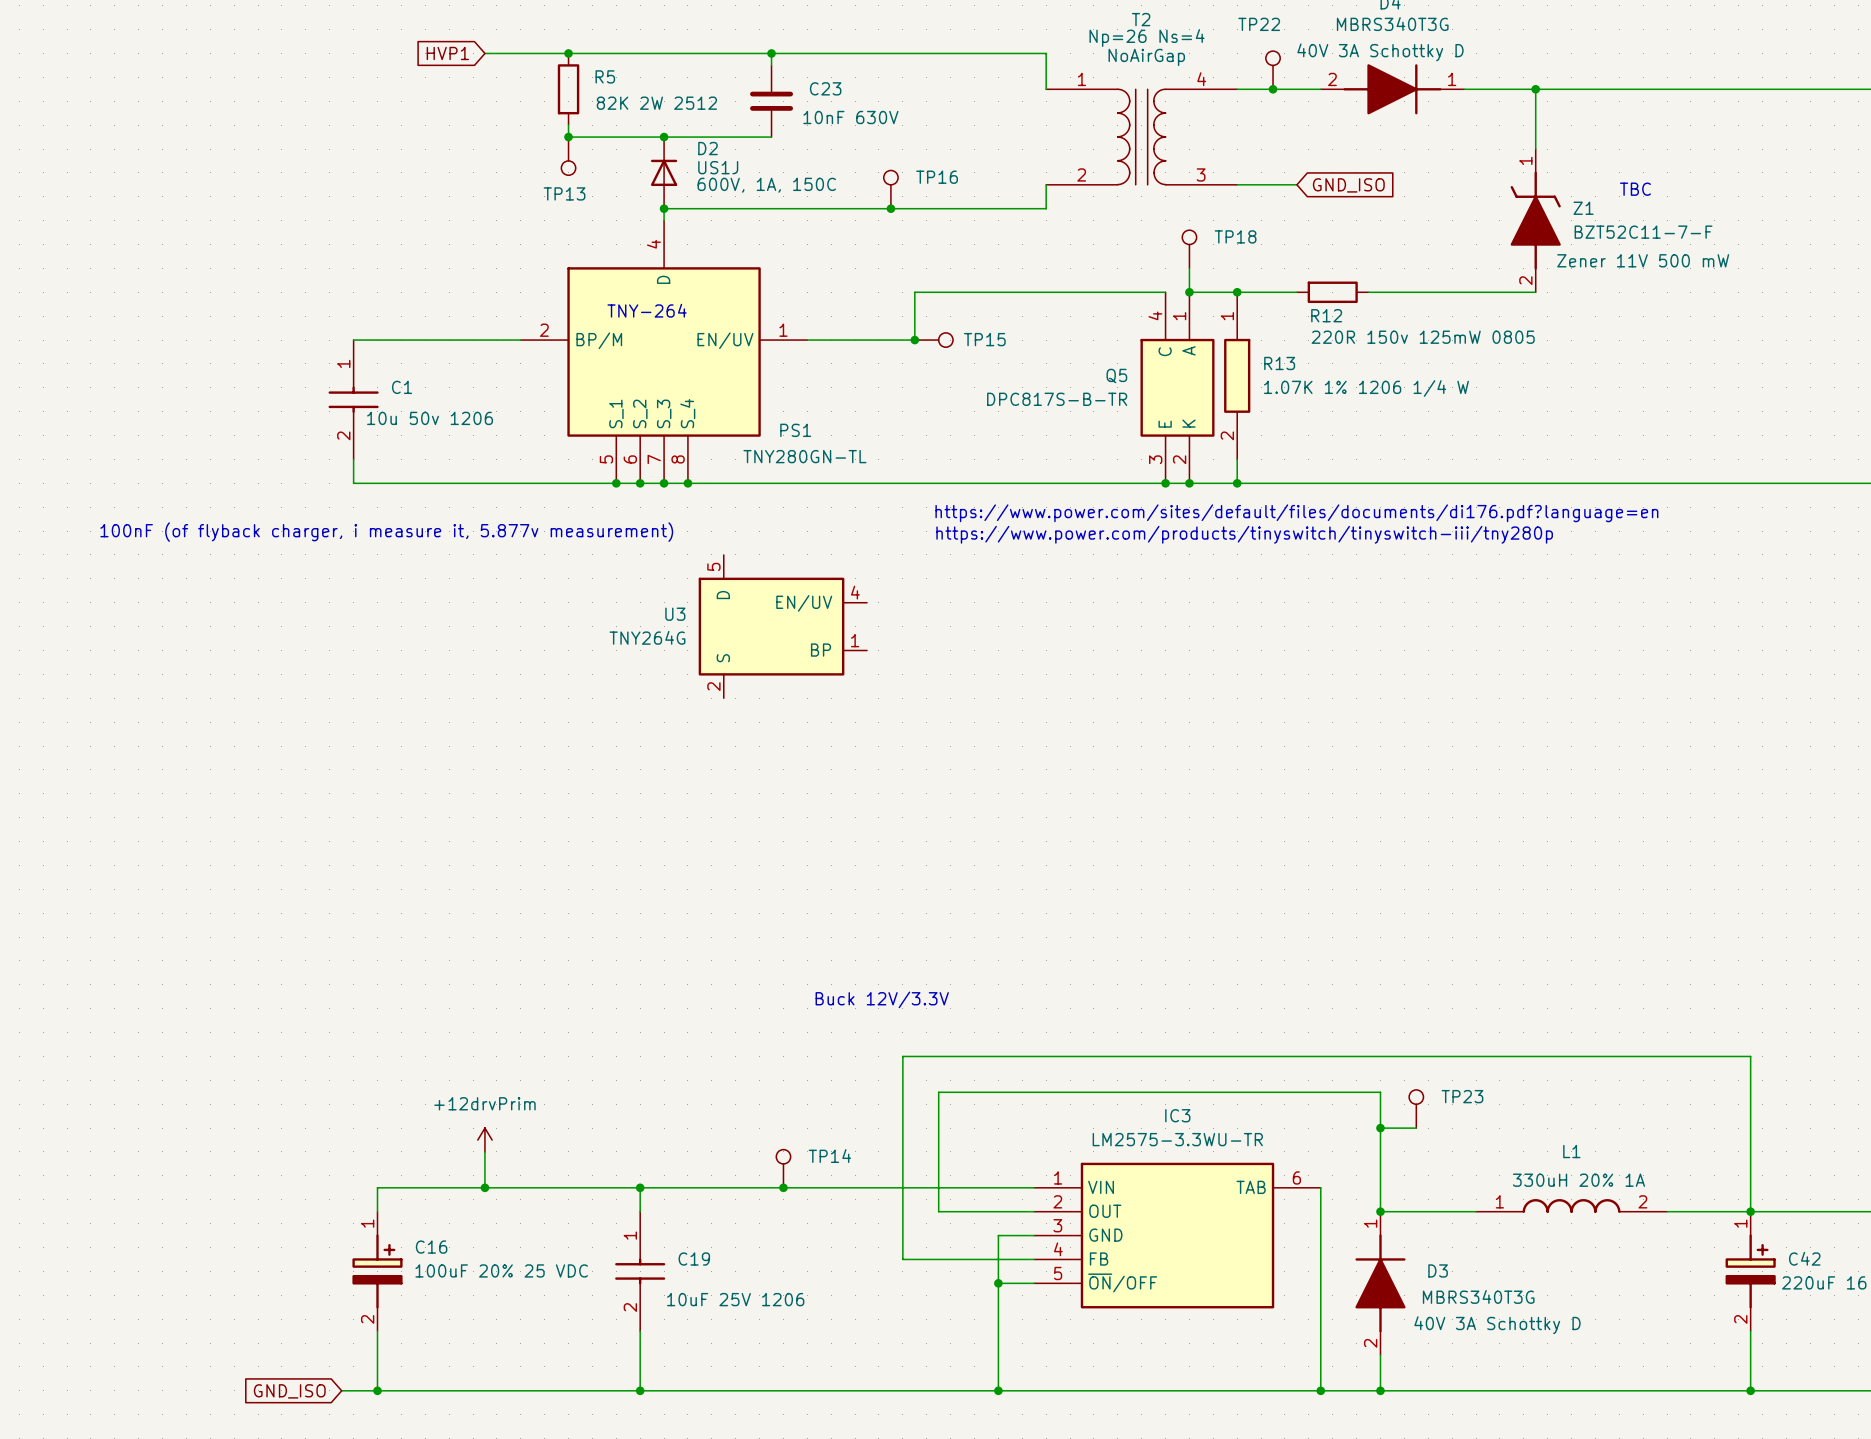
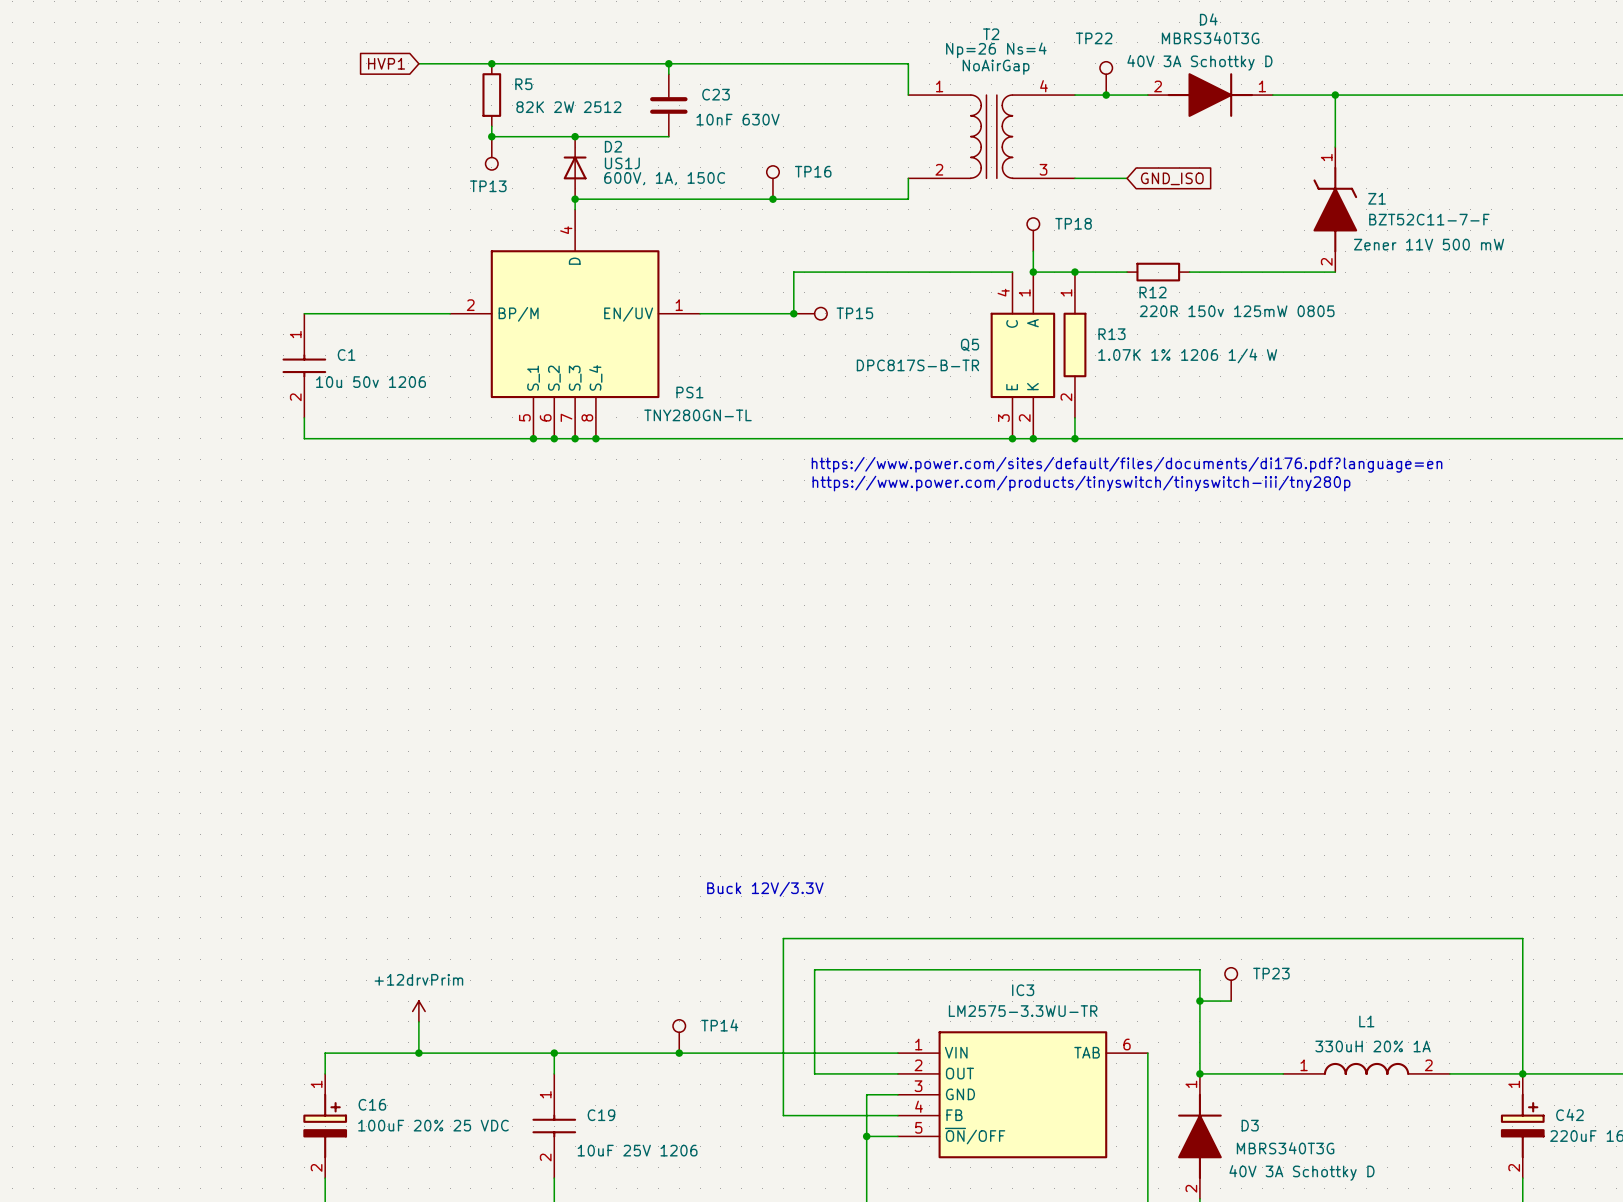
text: TBC (1635, 189) -> none
text: TNY-264 (647, 310) -> none
text: 100nF (of flyback charger, i measure it, 5.877v measurement) (386, 532) -> none
U3: TNY264G (782, 626) -> none

